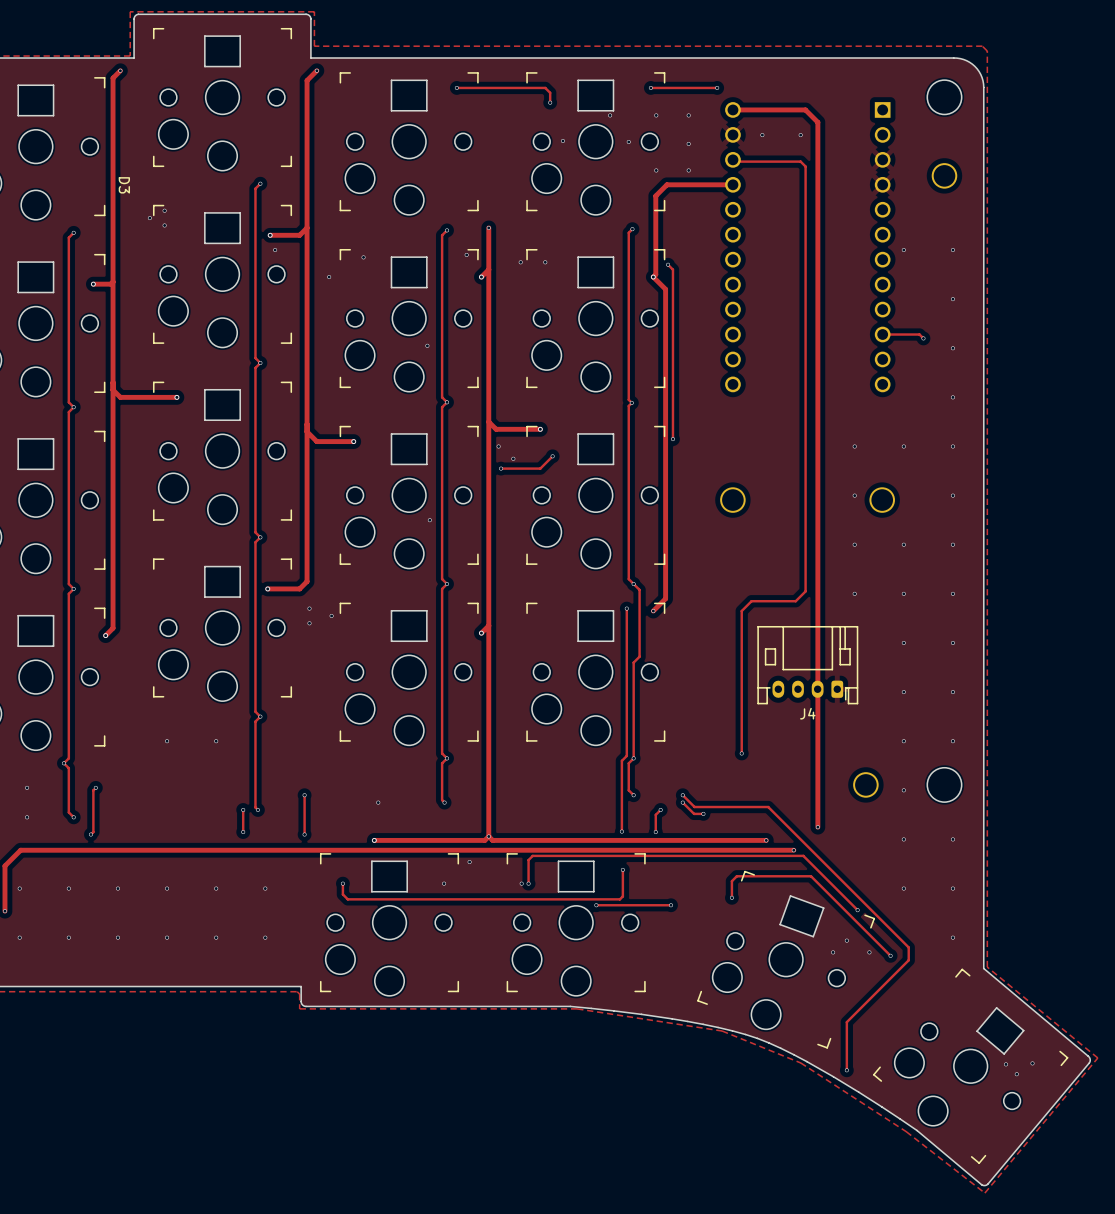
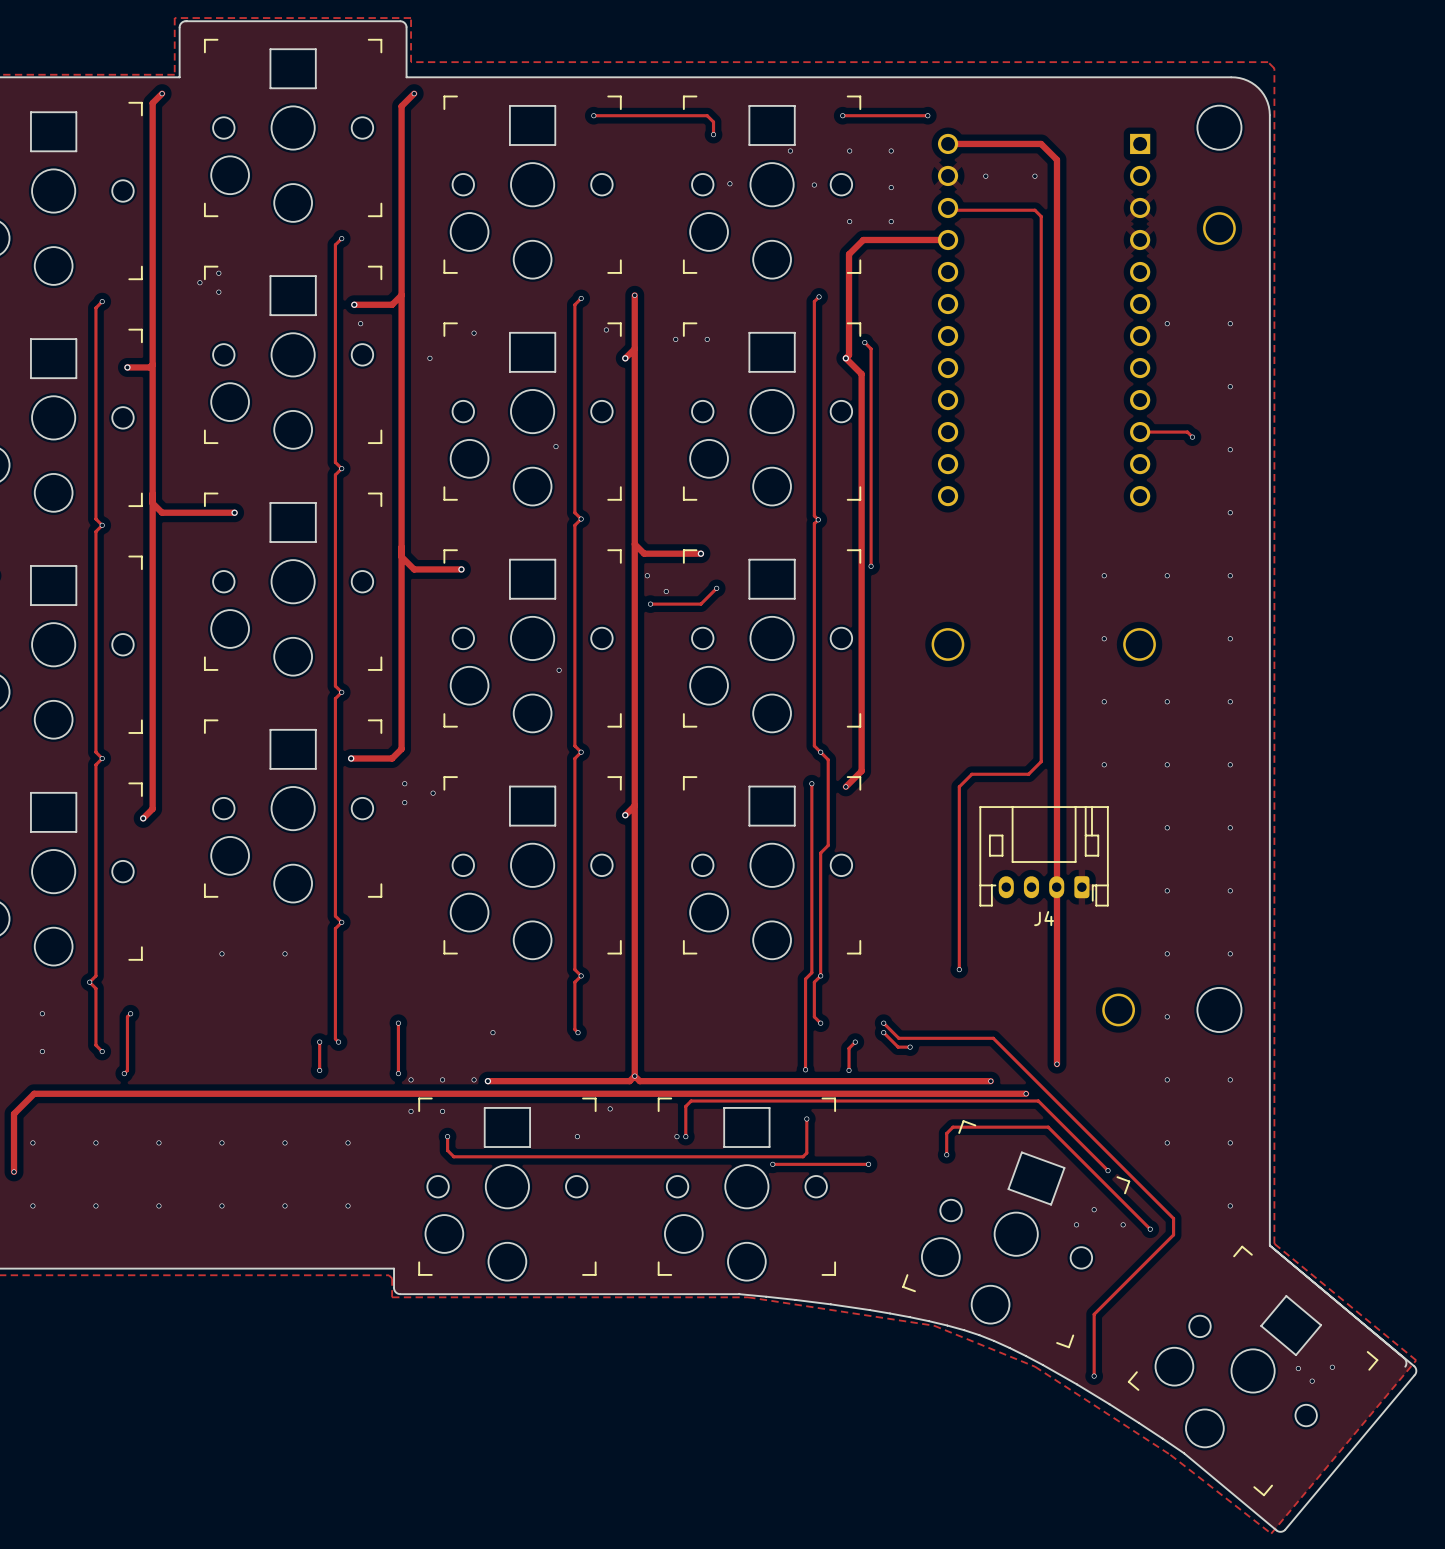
D3: (124, 185) -> none
via: none -> (411, 1079)
via: none -> (442, 1079)
via: none -> (474, 1079)
via: none -> (411, 1111)
via: none -> (442, 1111)
board edge: (1089, 1063) (986, 1185) (981, 1184) (917, 1130) -> (1269, 1245) (1414, 1366) (1416, 1372) (1282, 1531) (1276, 1530) (1184, 1453)

